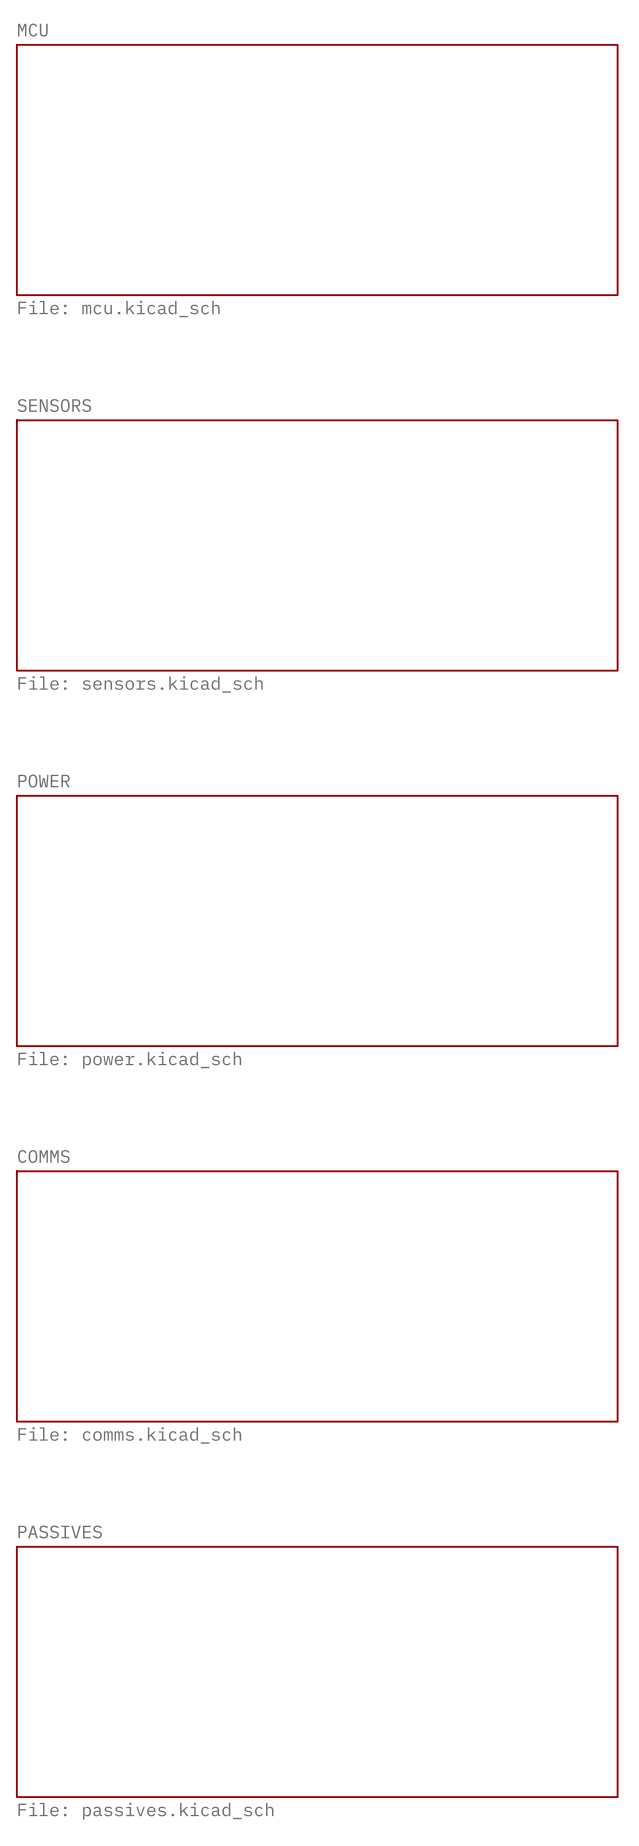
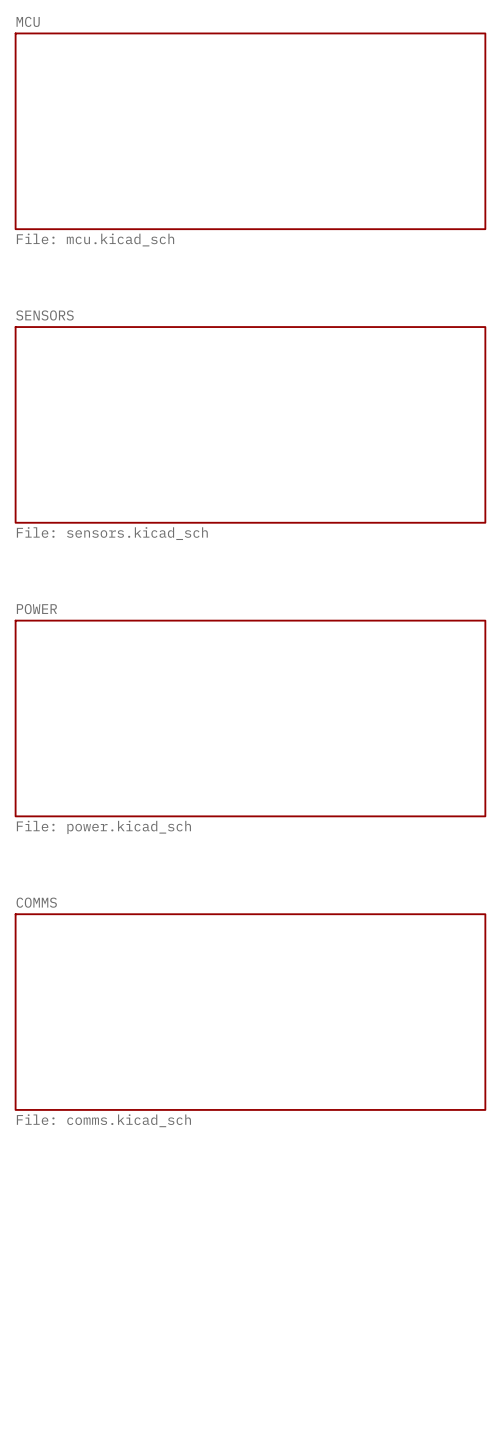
sheet PASSIVES: File: passives.kicad_sch (317, 1671) -> none

